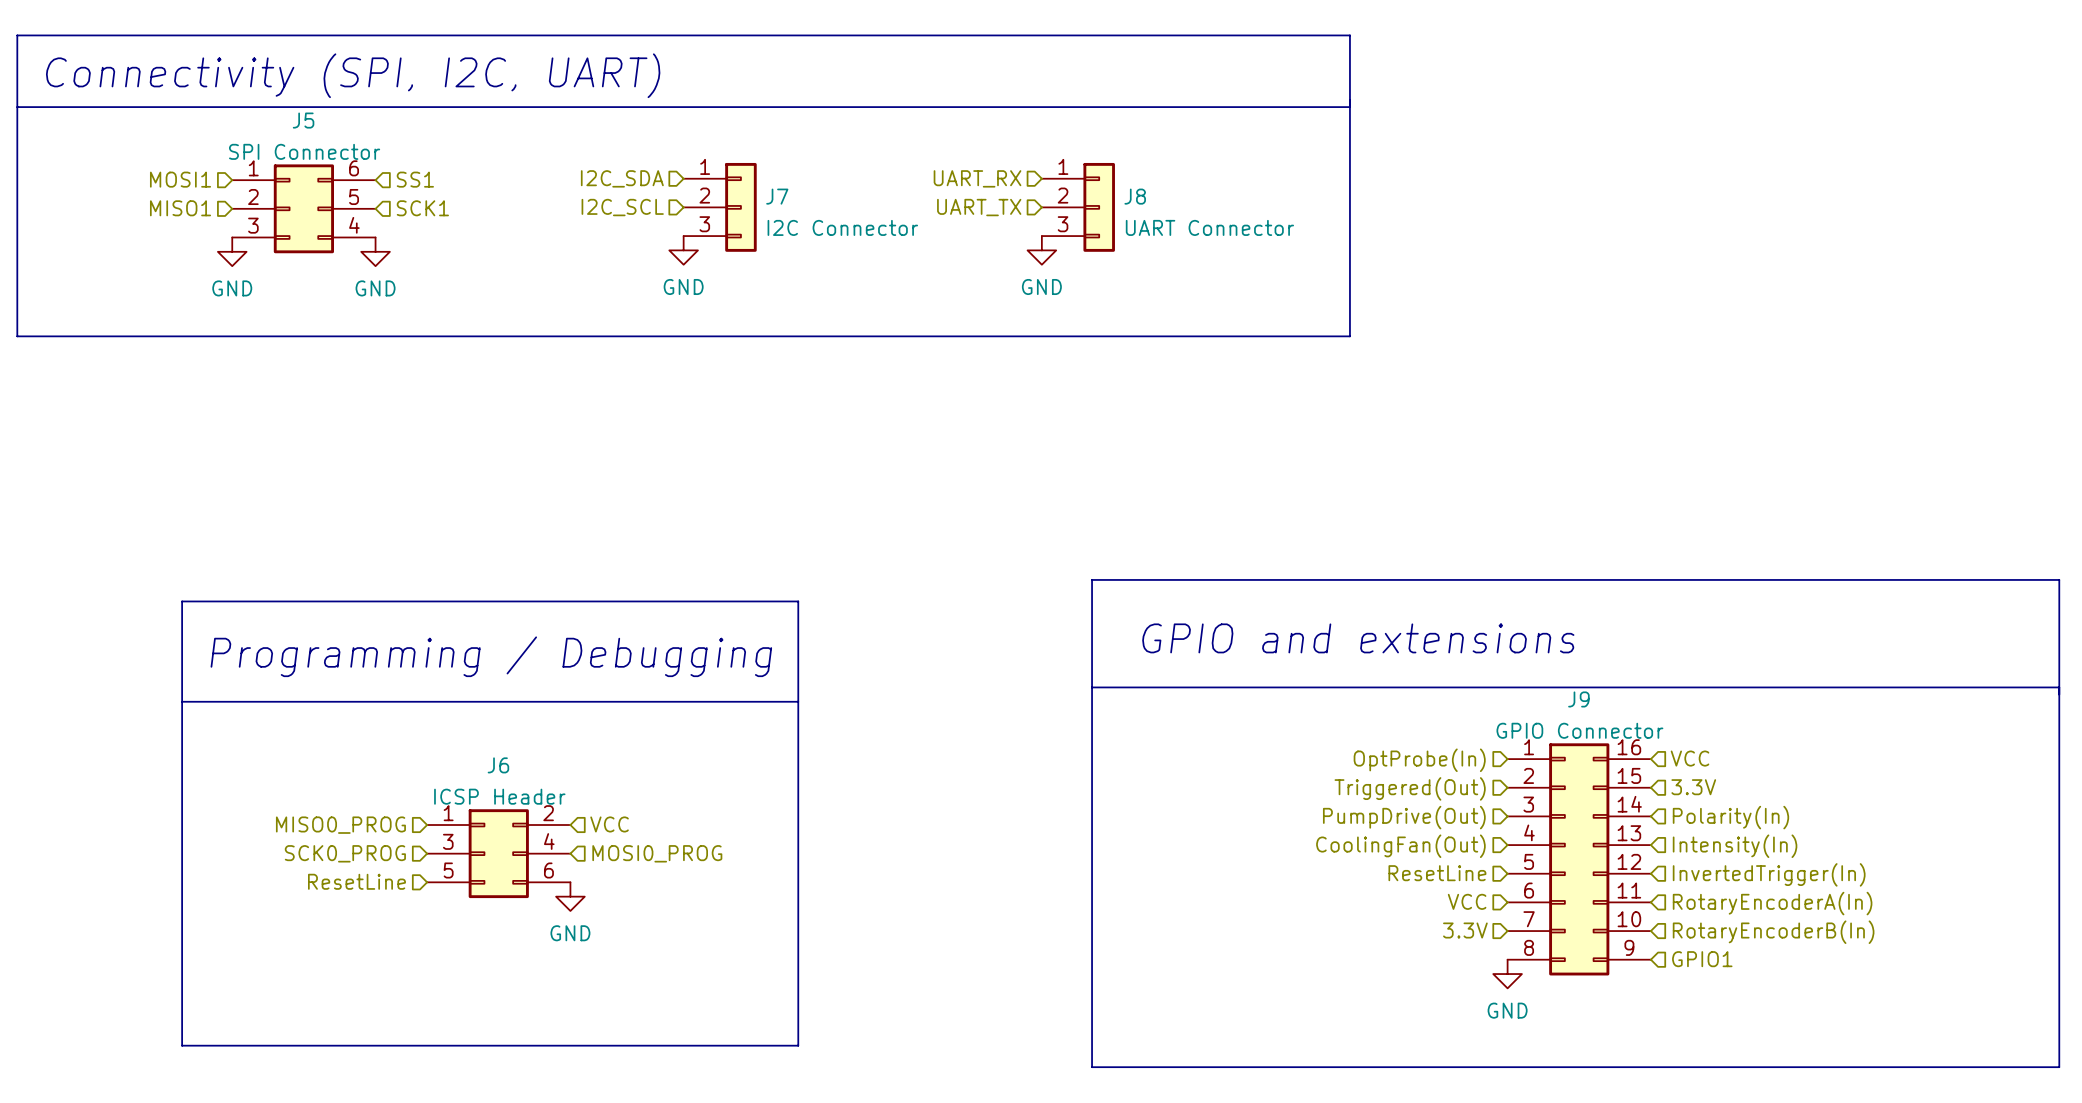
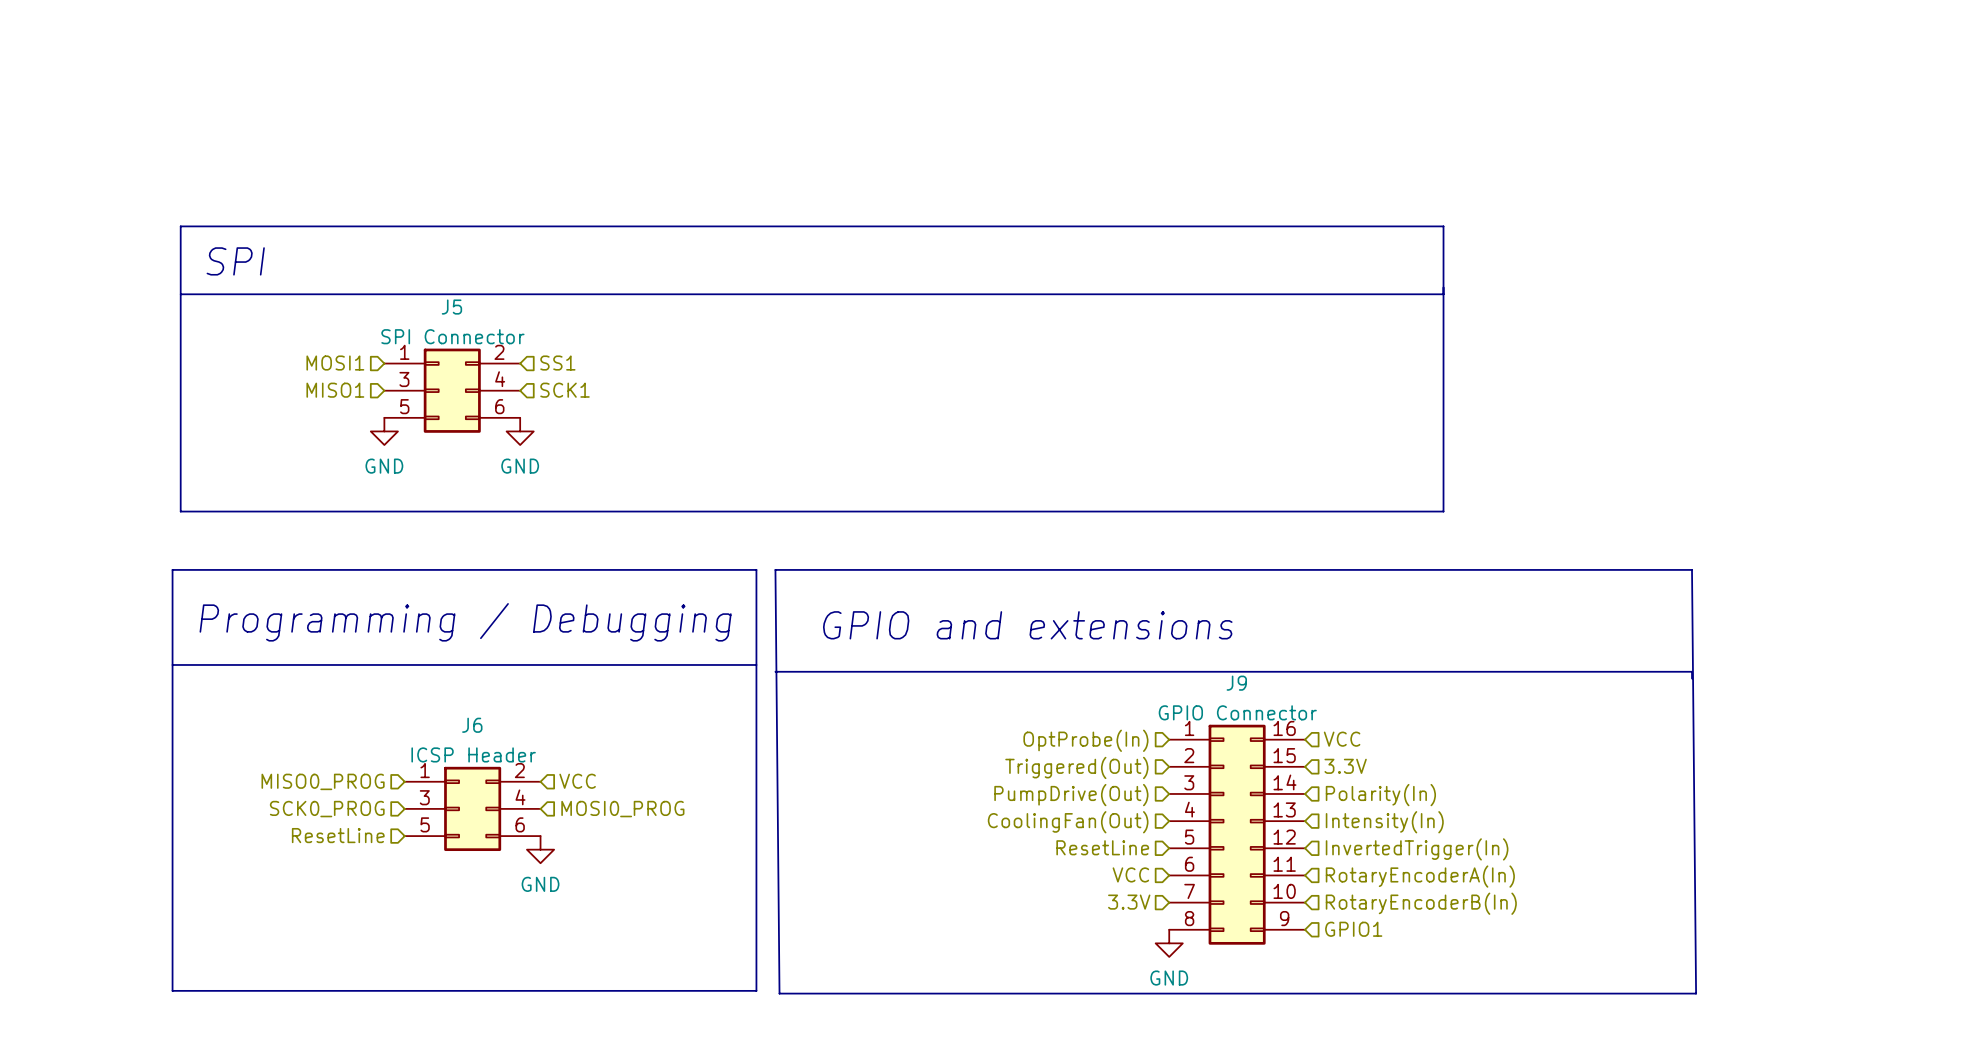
line: (17, 35) (17, 336) (1349, 336) (1349, 35) (17, 35) -> (180, 226) (180, 511) (1443, 511) (1443, 226) (180, 226)
text: Connectivity (SPI, I2C, UART) (353, 75) -> none
line: (17, 107) (1349, 107) -> (180, 294) (1443, 294)
J5 pin number: 6 (354, 168) -> 2 (499, 352)
hierarchical label: I2C_SDA (622, 178) -> none
hierarchical label: UART_RX (977, 178) -> none
hierarchical label position: MOSI1 (180, 179) -> MOSI1 (335, 363)
hierarchical label position: SS1 (415, 179) -> SS1 (557, 363)
J5 pin number: 2 (253, 197) -> 3 (404, 379)
J5 pin number: 5 (354, 197) -> 4 (500, 379)
hierarchical label: I2C_SCL (622, 207) -> none
J7: I2C Connector (720, 207) -> none
hierarchical label: UART_TX (979, 207) -> none
J8: UART Connector (1078, 207) -> none
hierarchical label position: MISO1 (180, 208) -> MISO1 (335, 390)
J5 position: (303, 208) -> (452, 390)
hierarchical label position: SCK1 (422, 208) -> SCK1 (564, 390)
J5 pin number: 3 (253, 225) -> 5 (404, 406)
J5 pin number: 4 (354, 225) -> 6 (499, 406)
power symbol: GND (683, 250) -> none
power symbol: GND (1041, 250) -> none
power symbol: GND (232, 251) -> none
power symbol: GND (375, 251) -> none
text: none -> SPI (235, 261)
power symbol: none -> GND (384, 431)
power symbol: none -> GND (520, 431)
line: (1092, 579) (1092, 1067) (2059, 1067) (2059, 579) (1092, 579) -> (775, 569) (779, 993) (1696, 993) (1692, 569) (775, 569)
text position: GPIO and extensions (1358, 638) -> GPIO and extensions (1027, 625)
line: (1092, 687) (2059, 687) -> none
line: none -> (775, 671) (1692, 671) (1692, 678)
hierarchical label: VCC (1690, 758) -> none
hierarchical label position: OptProbe(In) (1419, 760) -> OptProbe(In) (1085, 740)
hierarchical label: none -> VCC (1342, 739)
hierarchical label: 3.3V (1693, 787) -> none
hierarchical label position: Triggered(Out) (1410, 788) -> Triggered(Out) (1076, 767)
hierarchical label: none -> 3.3V (1345, 766)
hierarchical label position: PumpDrive(Out) (1404, 817) -> PumpDrive(Out) (1071, 795)
hierarchical label position: Polarity(In) (1730, 817) -> Polarity(In) (1380, 795)
hierarchical label position: CoolingFan(Out) (1400, 846) -> CoolingFan(Out) (1068, 822)
hierarchical label position: Intensity(In) (1735, 846) -> Intensity(In) (1384, 822)
J9 position: (1579, 859) -> (1237, 834)
hierarchical label position: ResetLine (1437, 873) -> ResetLine (1102, 847)
hierarchical label position: InvertedTrigger(In) (1769, 874) -> InvertedTrigger(In) (1417, 849)
hierarchical label: VCC (1467, 901) -> none
hierarchical label position: RotaryEncoderA(In) (1772, 903) -> RotaryEncoderA(In) (1420, 876)
hierarchical label: none -> VCC (1130, 874)
hierarchical label: 3.3V (1465, 930) -> none
hierarchical label position: RotaryEncoderB(In) (1773, 932) -> RotaryEncoderB(In) (1421, 903)
hierarchical label: none -> 3.3V (1129, 902)
hierarchical label position: GPIO1 (1702, 959) -> GPIO1 (1353, 929)
power symbol position: GND (1507, 974) -> GND (1169, 943)

